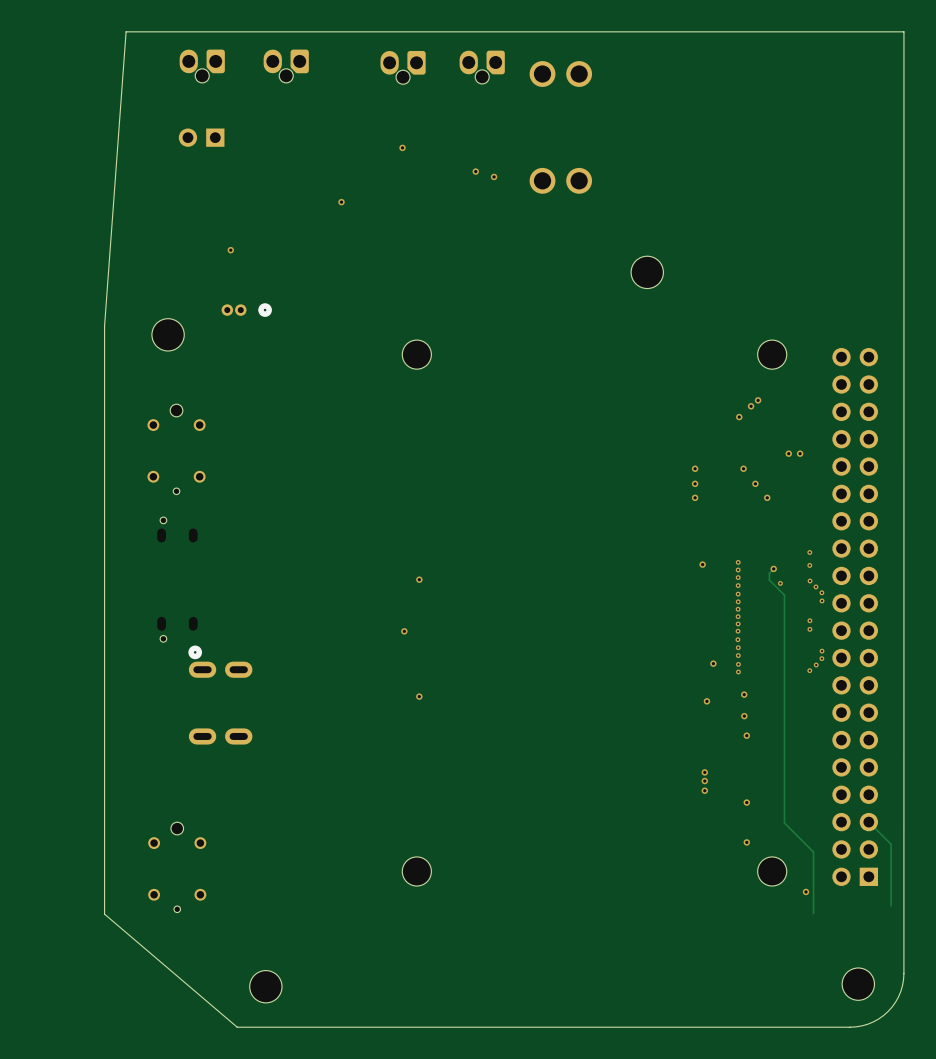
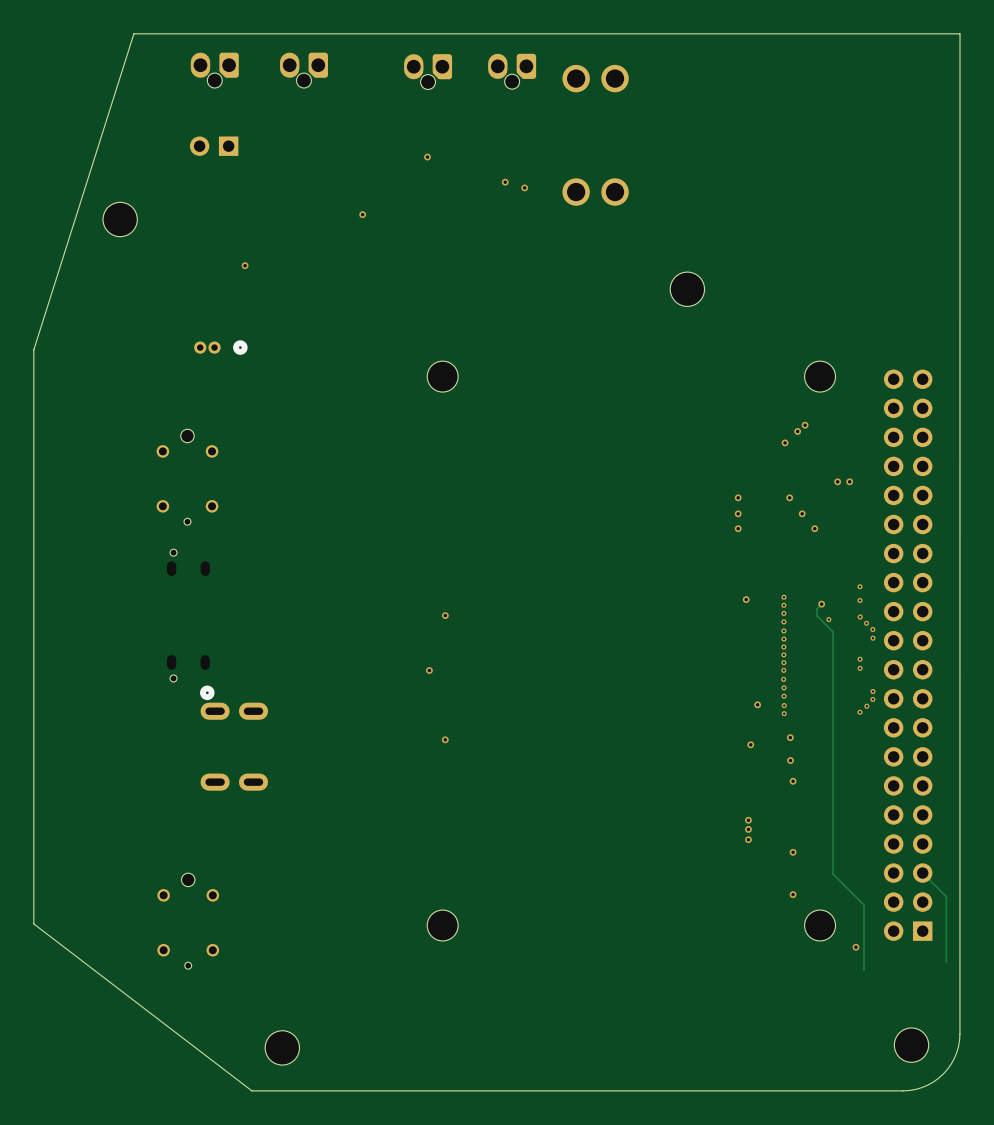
board edge: (126, 31) (104, 326) (104, 914) (237, 1027) -> (133, 33) (33, 349) (33, 923) (251, 1090)
part position: (246, 310) -> (220, 347)
part position: (168, 334) -> (120, 219)

